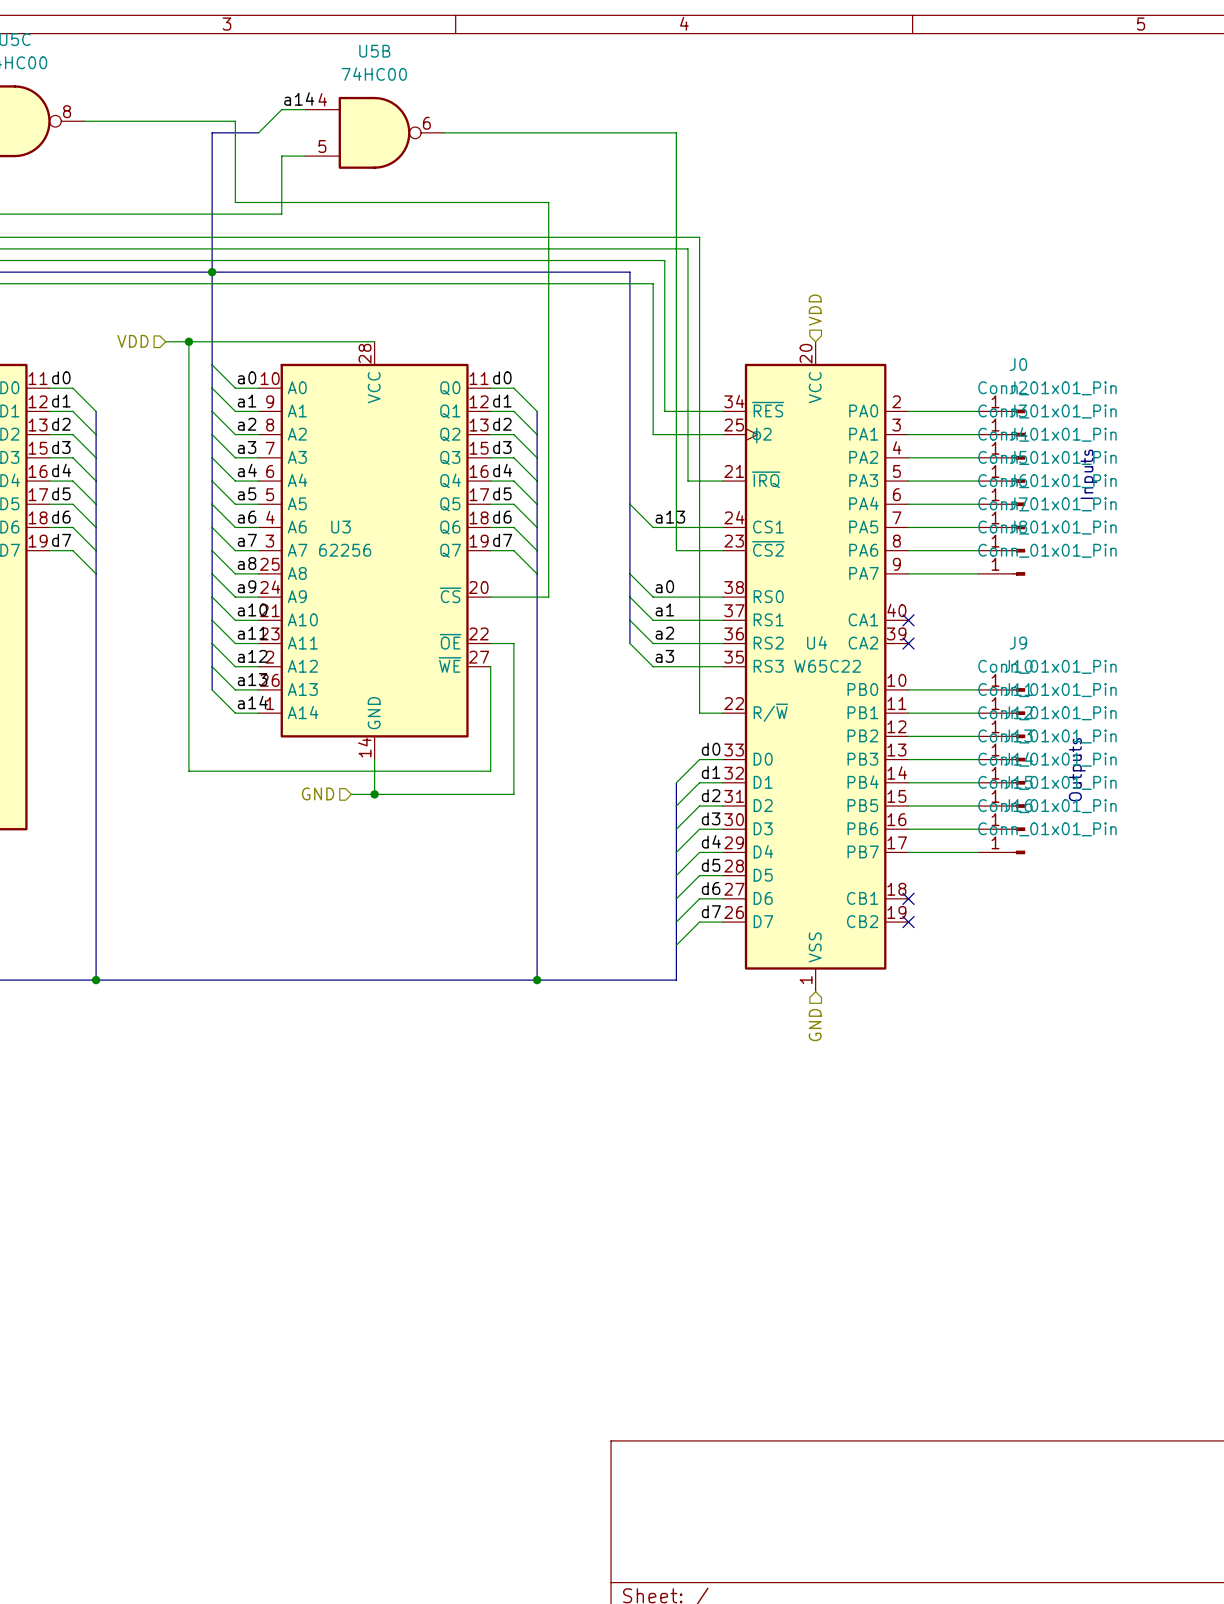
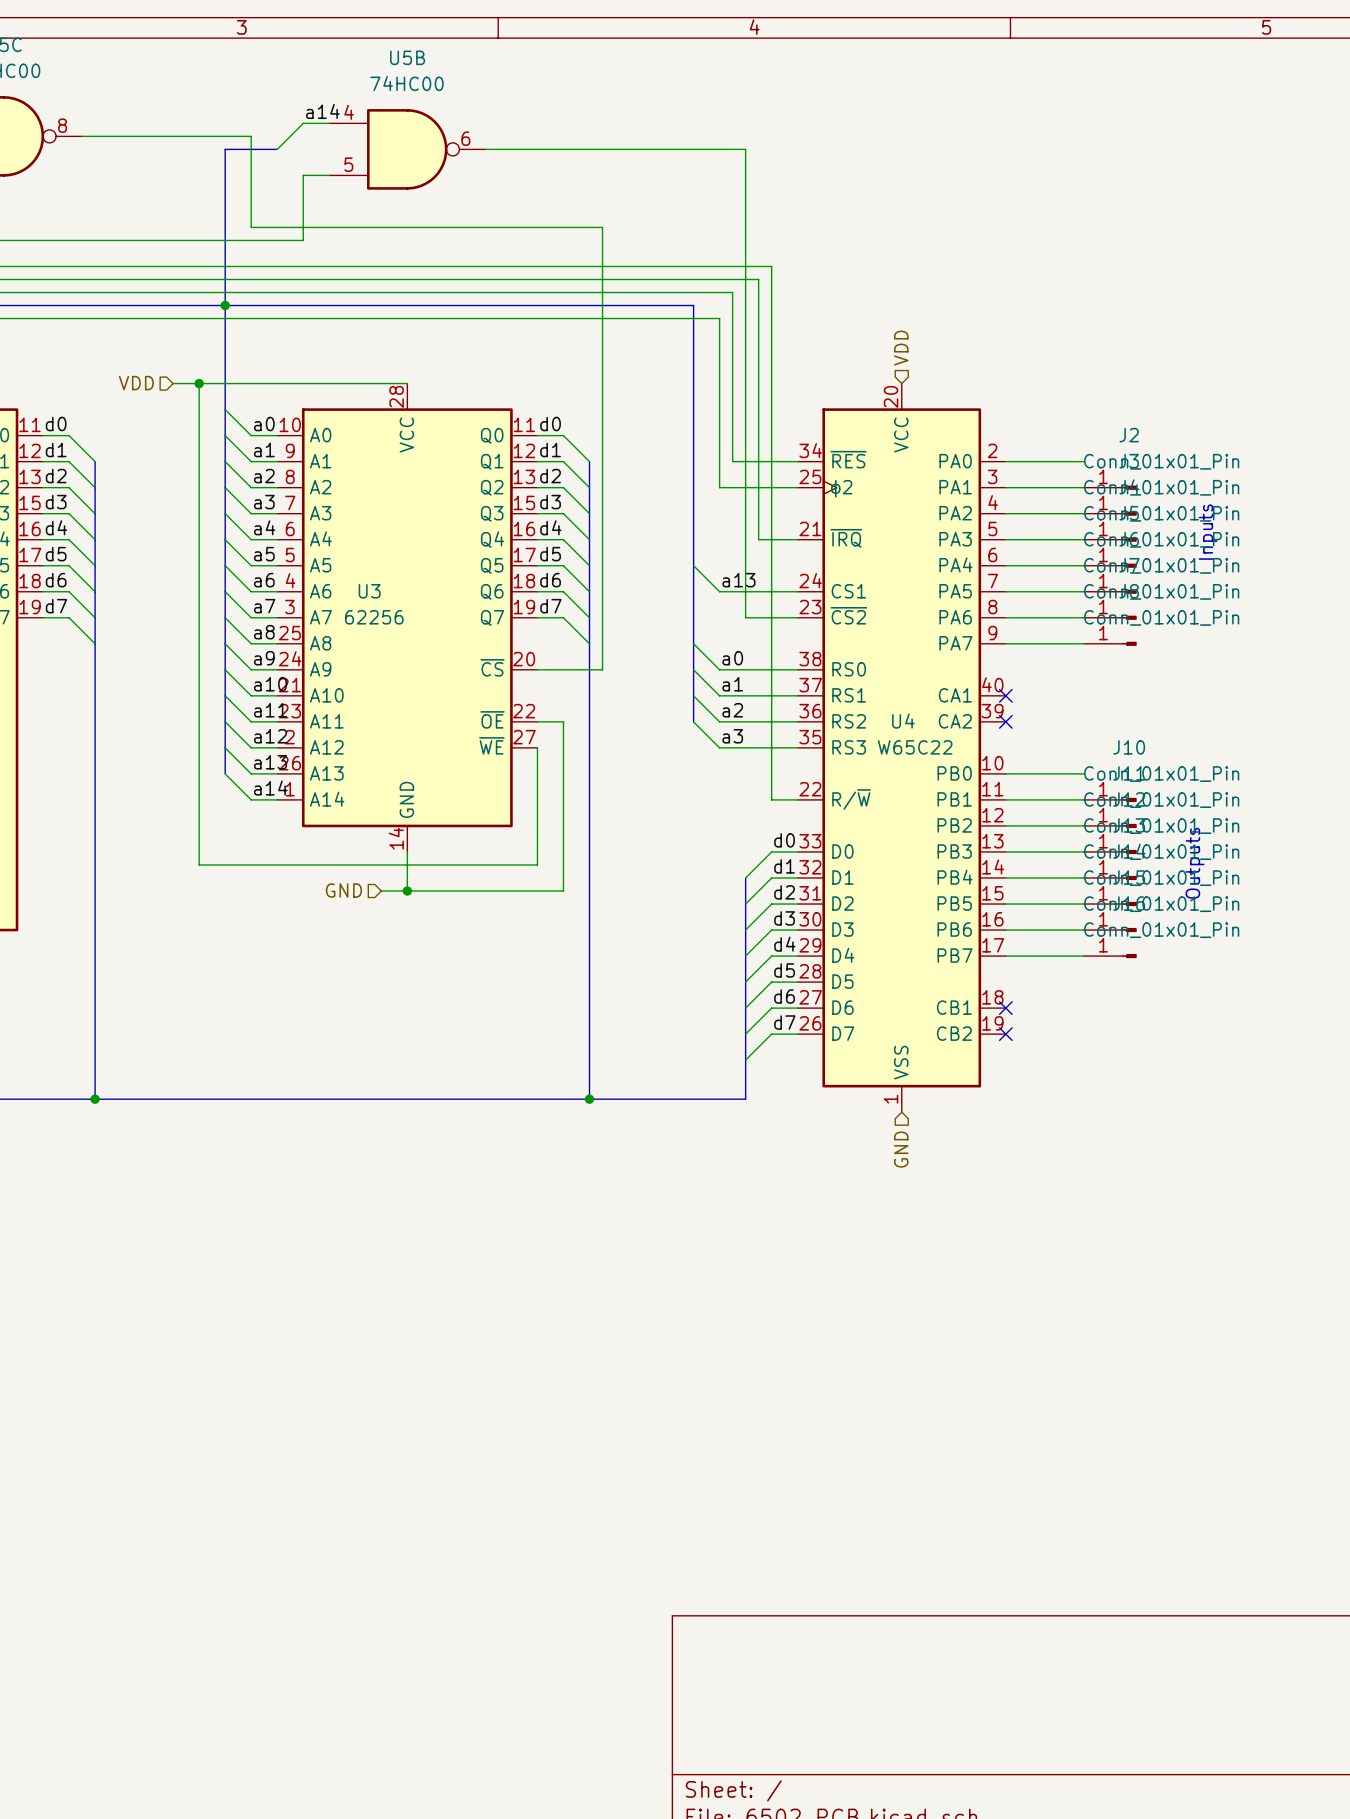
J0: Conn_01x01_Pin (1001, 411) -> none
J9: Conn_01x01_Pin (1001, 689) -> none

